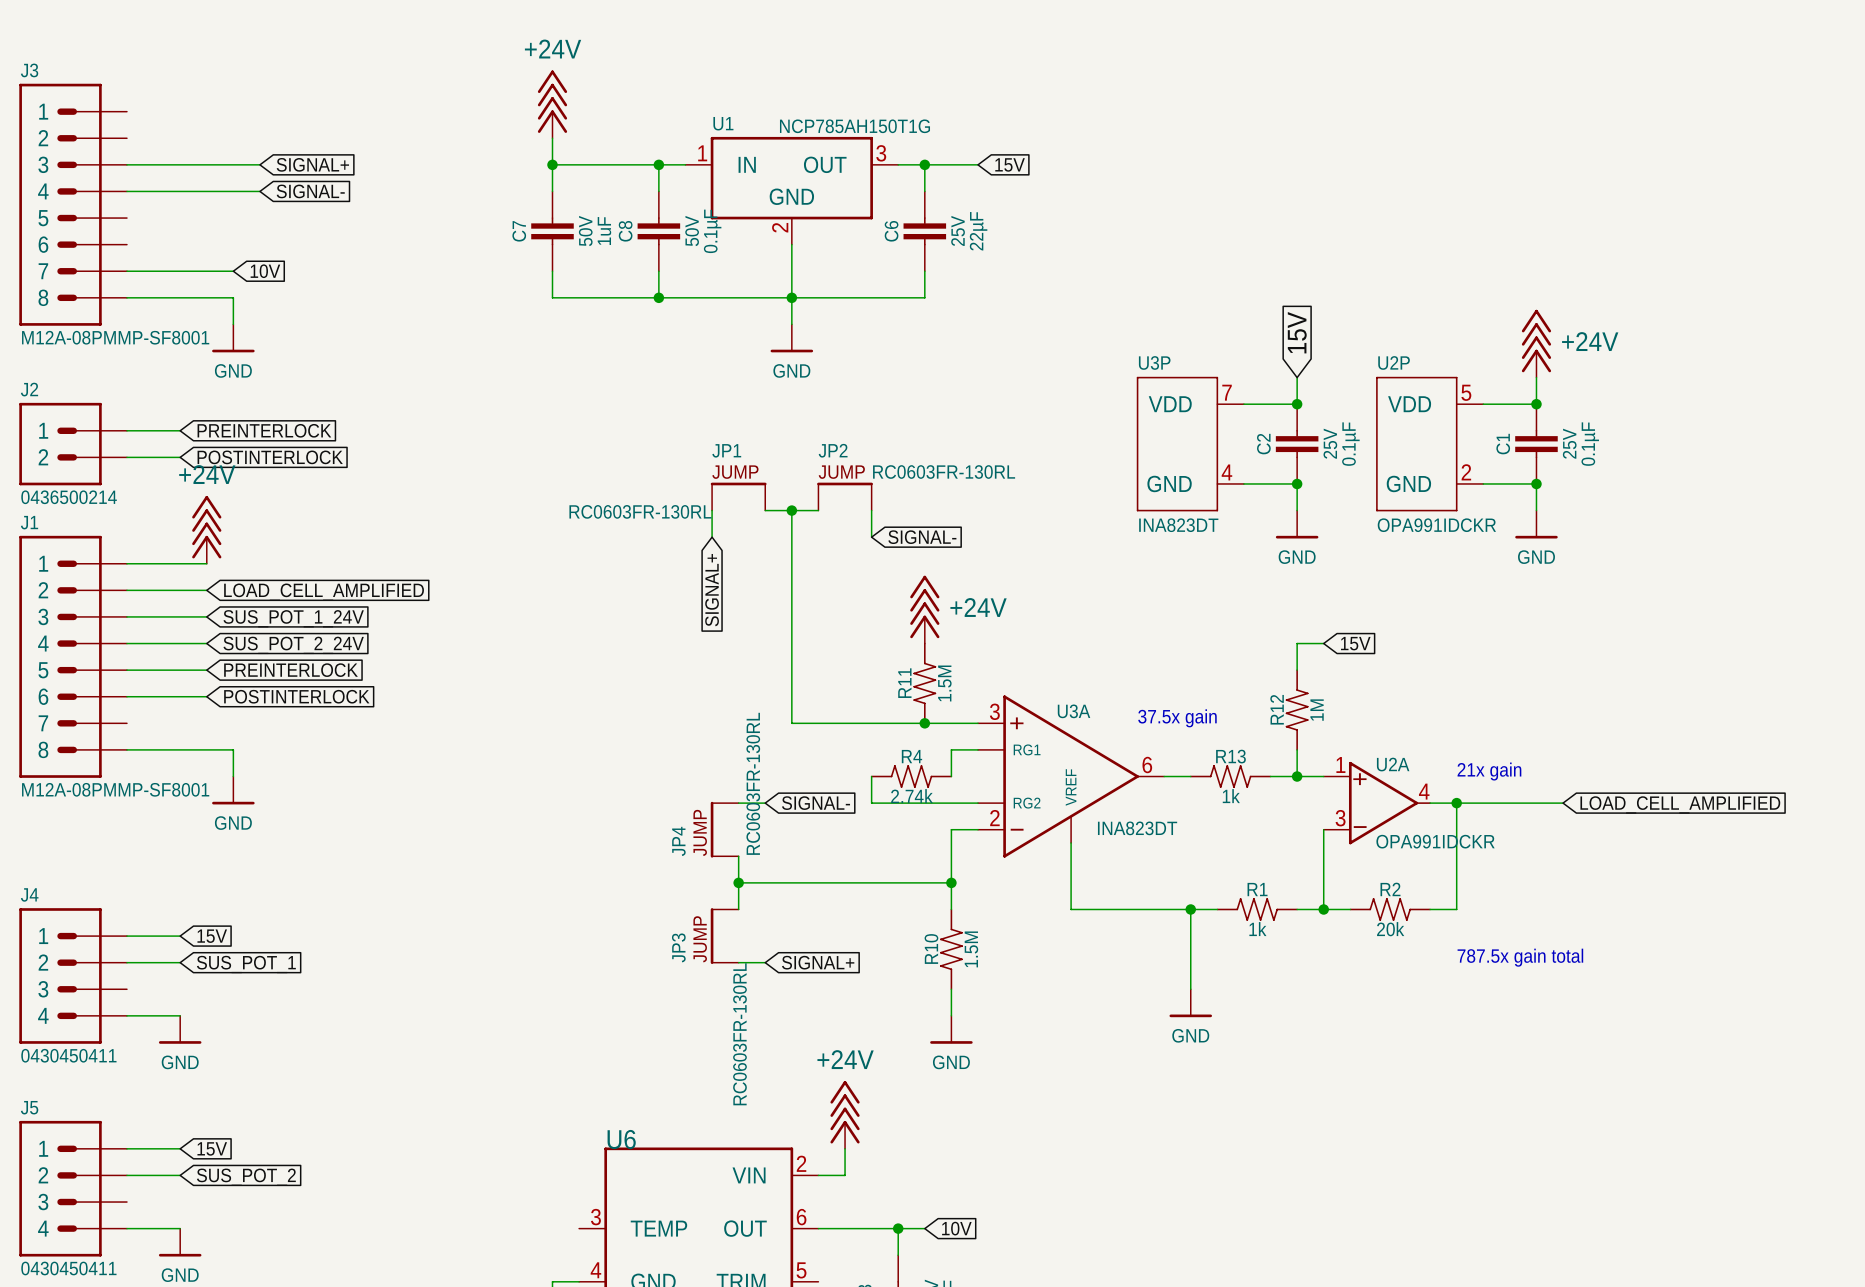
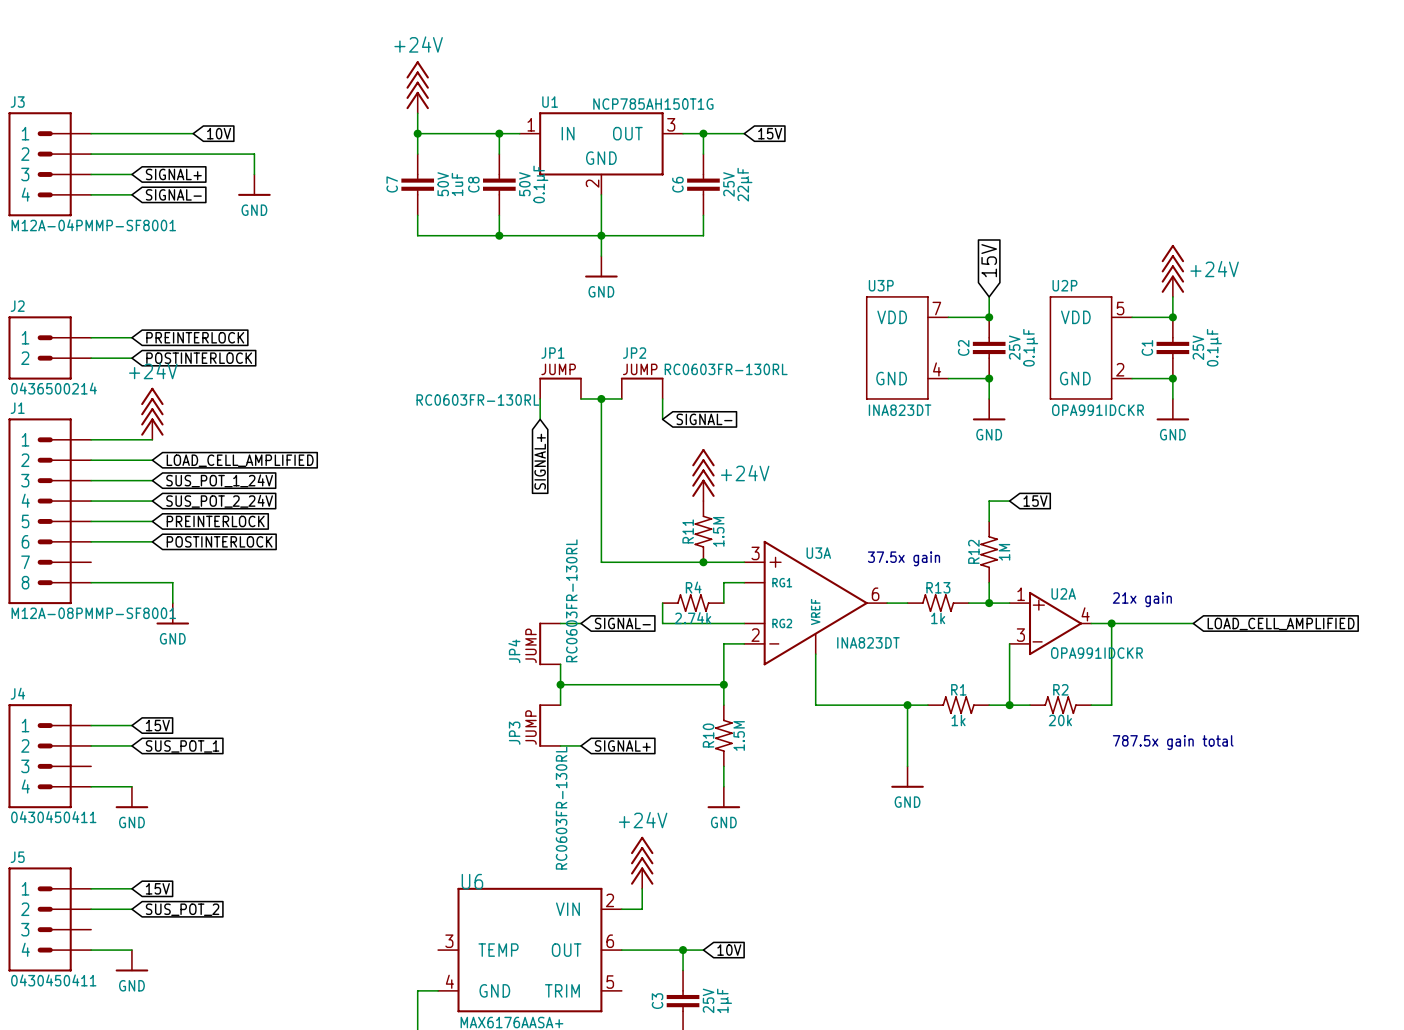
J3 name position: J3 (29, 70) -> J3 (17, 102)
J3 symbol: [19, 83, 127, 326] -> [8, 112, 92, 217]
global label: SIGNAL+ (312, 164) -> 10V (219, 133)
wire: none -> (193, 154) (254, 154) (254, 174)
global label position: SIGNAL- (310, 191) -> SIGNAL- (173, 194)
wire: none -> (91, 174) (131, 174)
global label: none -> SIGNAL+ (173, 174)
wire: none -> (91, 194) (131, 194)
wire: (126, 271) (233, 271) -> none
global label: 10V (265, 271) -> none
wire: (126, 297) (233, 297) (233, 324) -> none
J3 text: M12A-08PMMP-SF8001 (115, 337) -> M12A-04PMMP-SF8001 (93, 225)
power symbol position: GND (233, 338) -> GND (254, 185)

